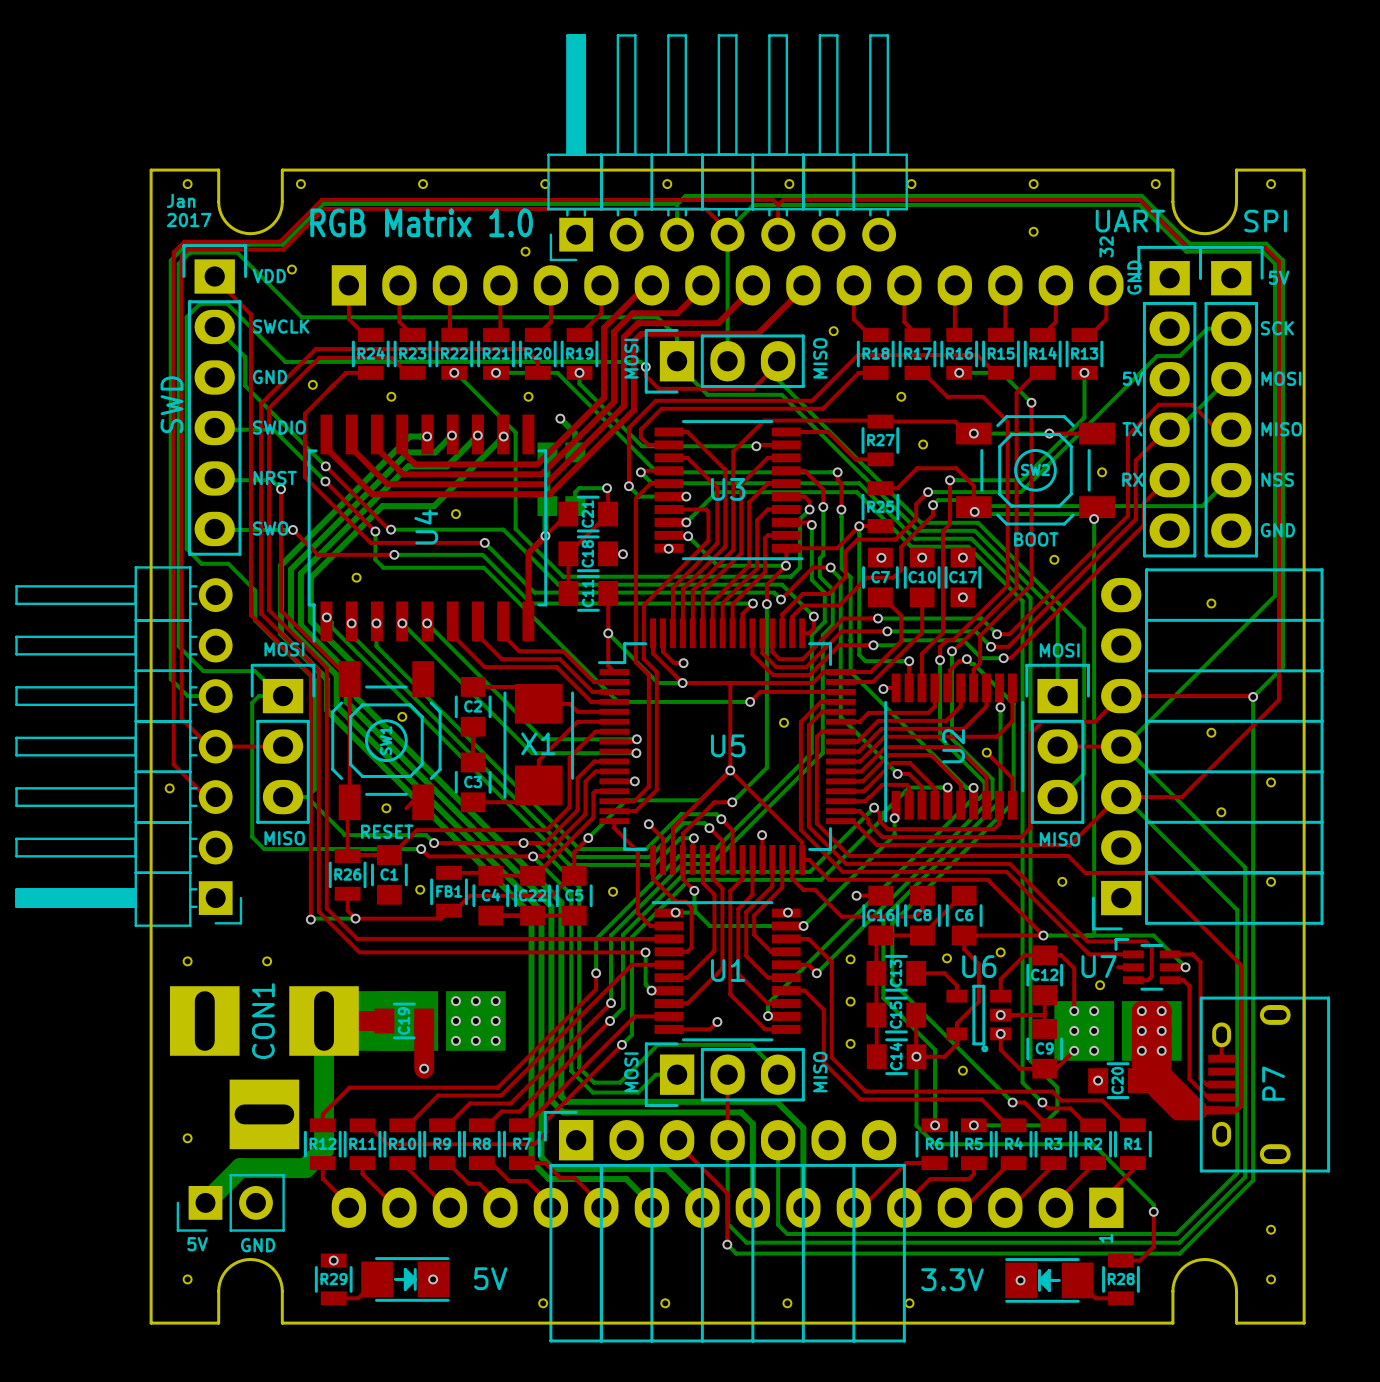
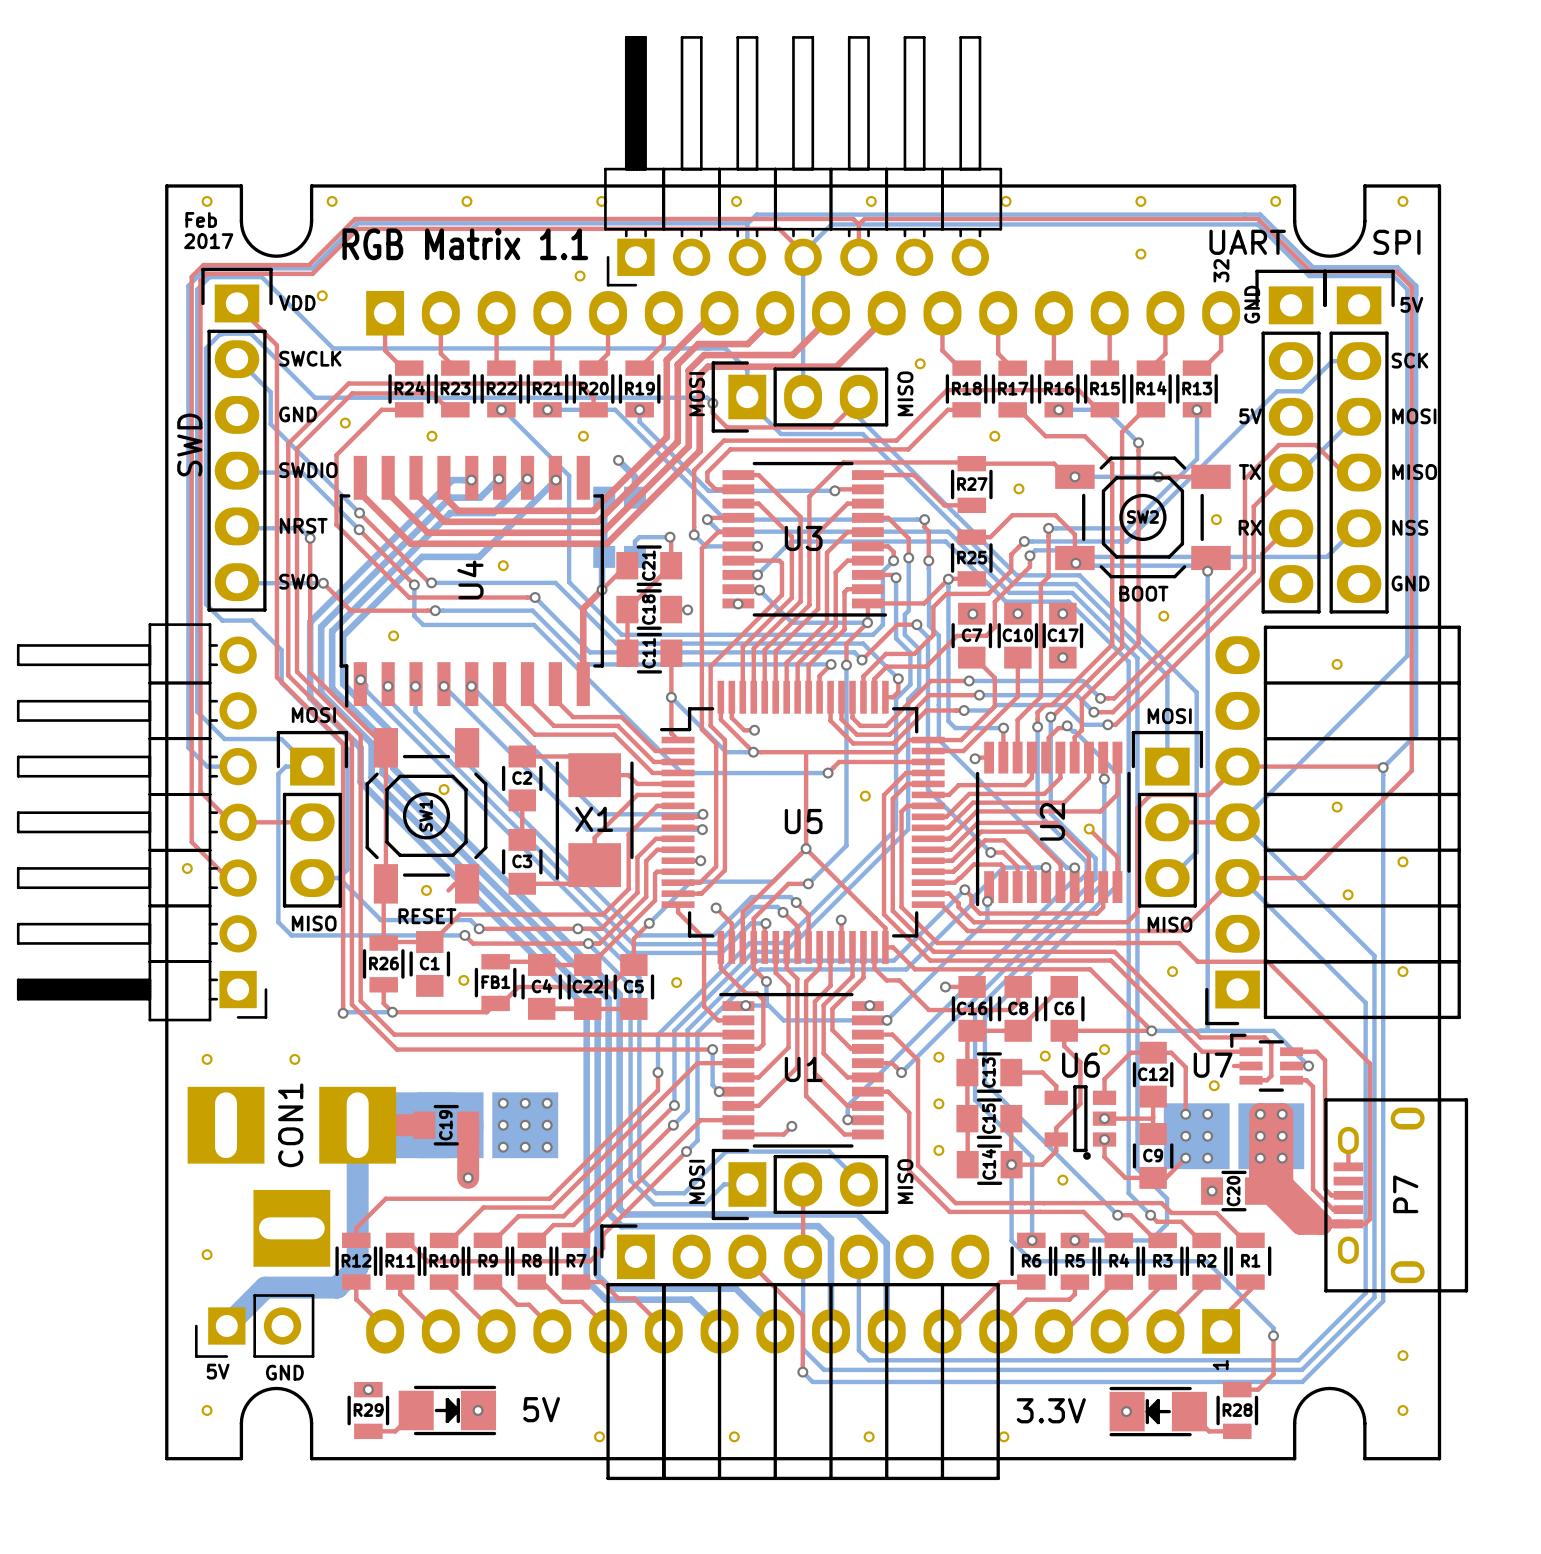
text: Jan (181, 200) -> Feb (201, 219)
text: RGB Matrix 1.0 (421, 222) -> RGB Matrix 1.1 (465, 244)

